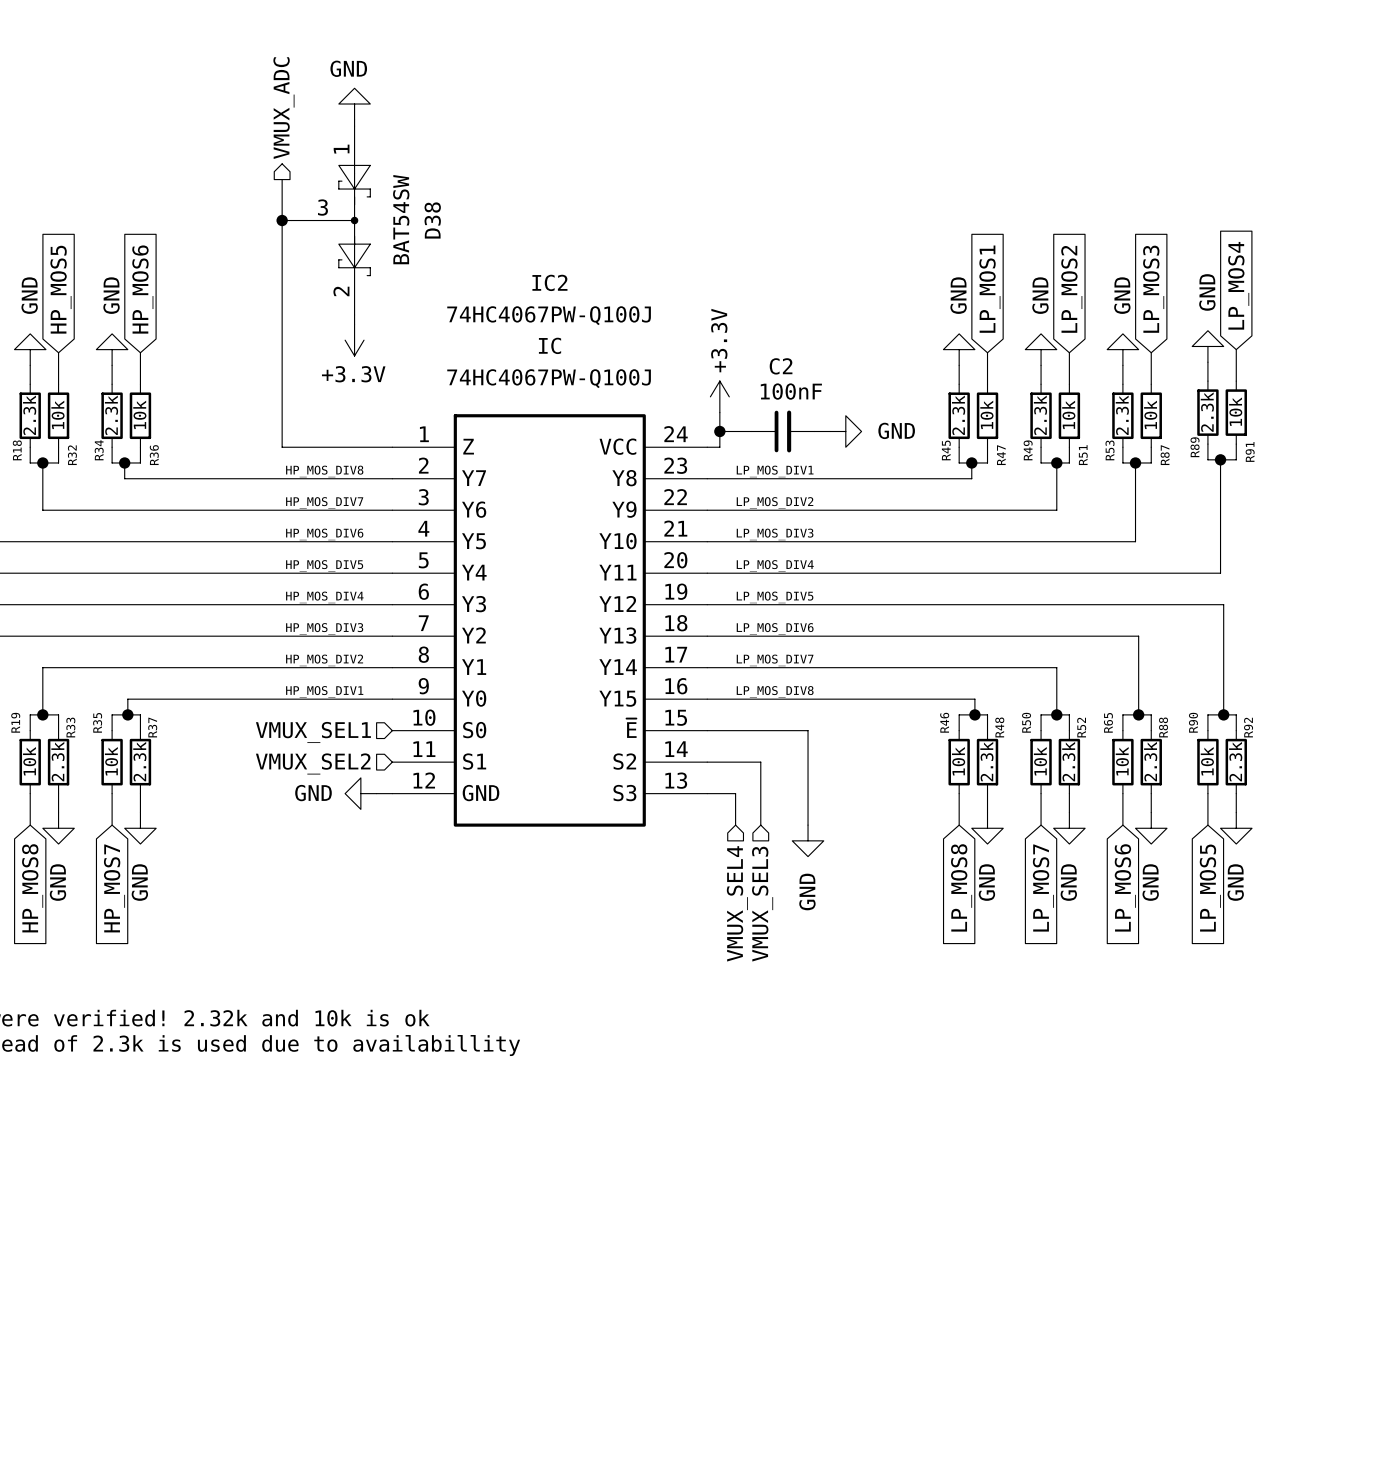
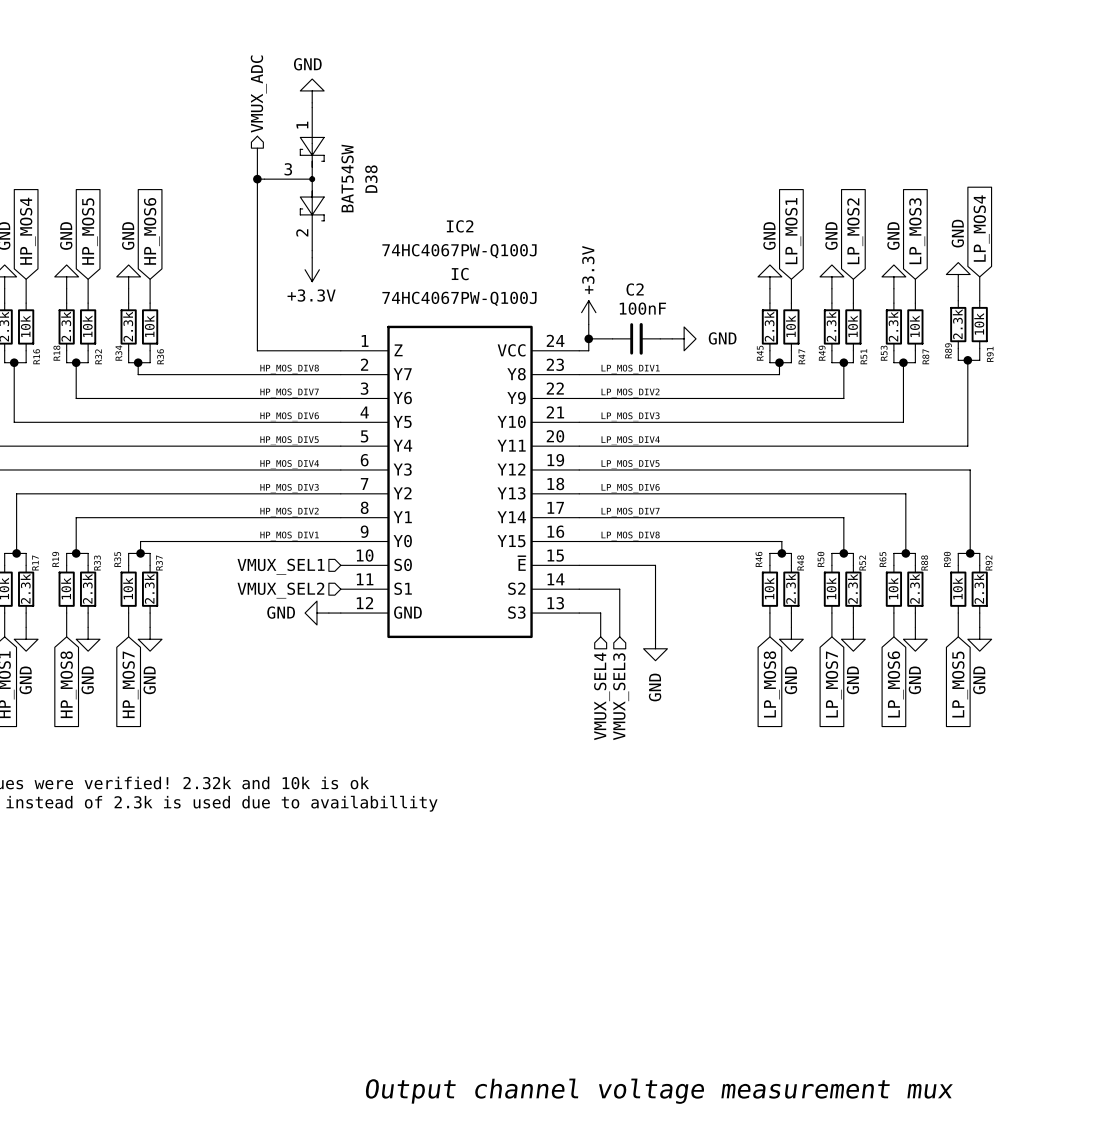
text: none -> Output channel voltage measurement mux (659, 1091)

